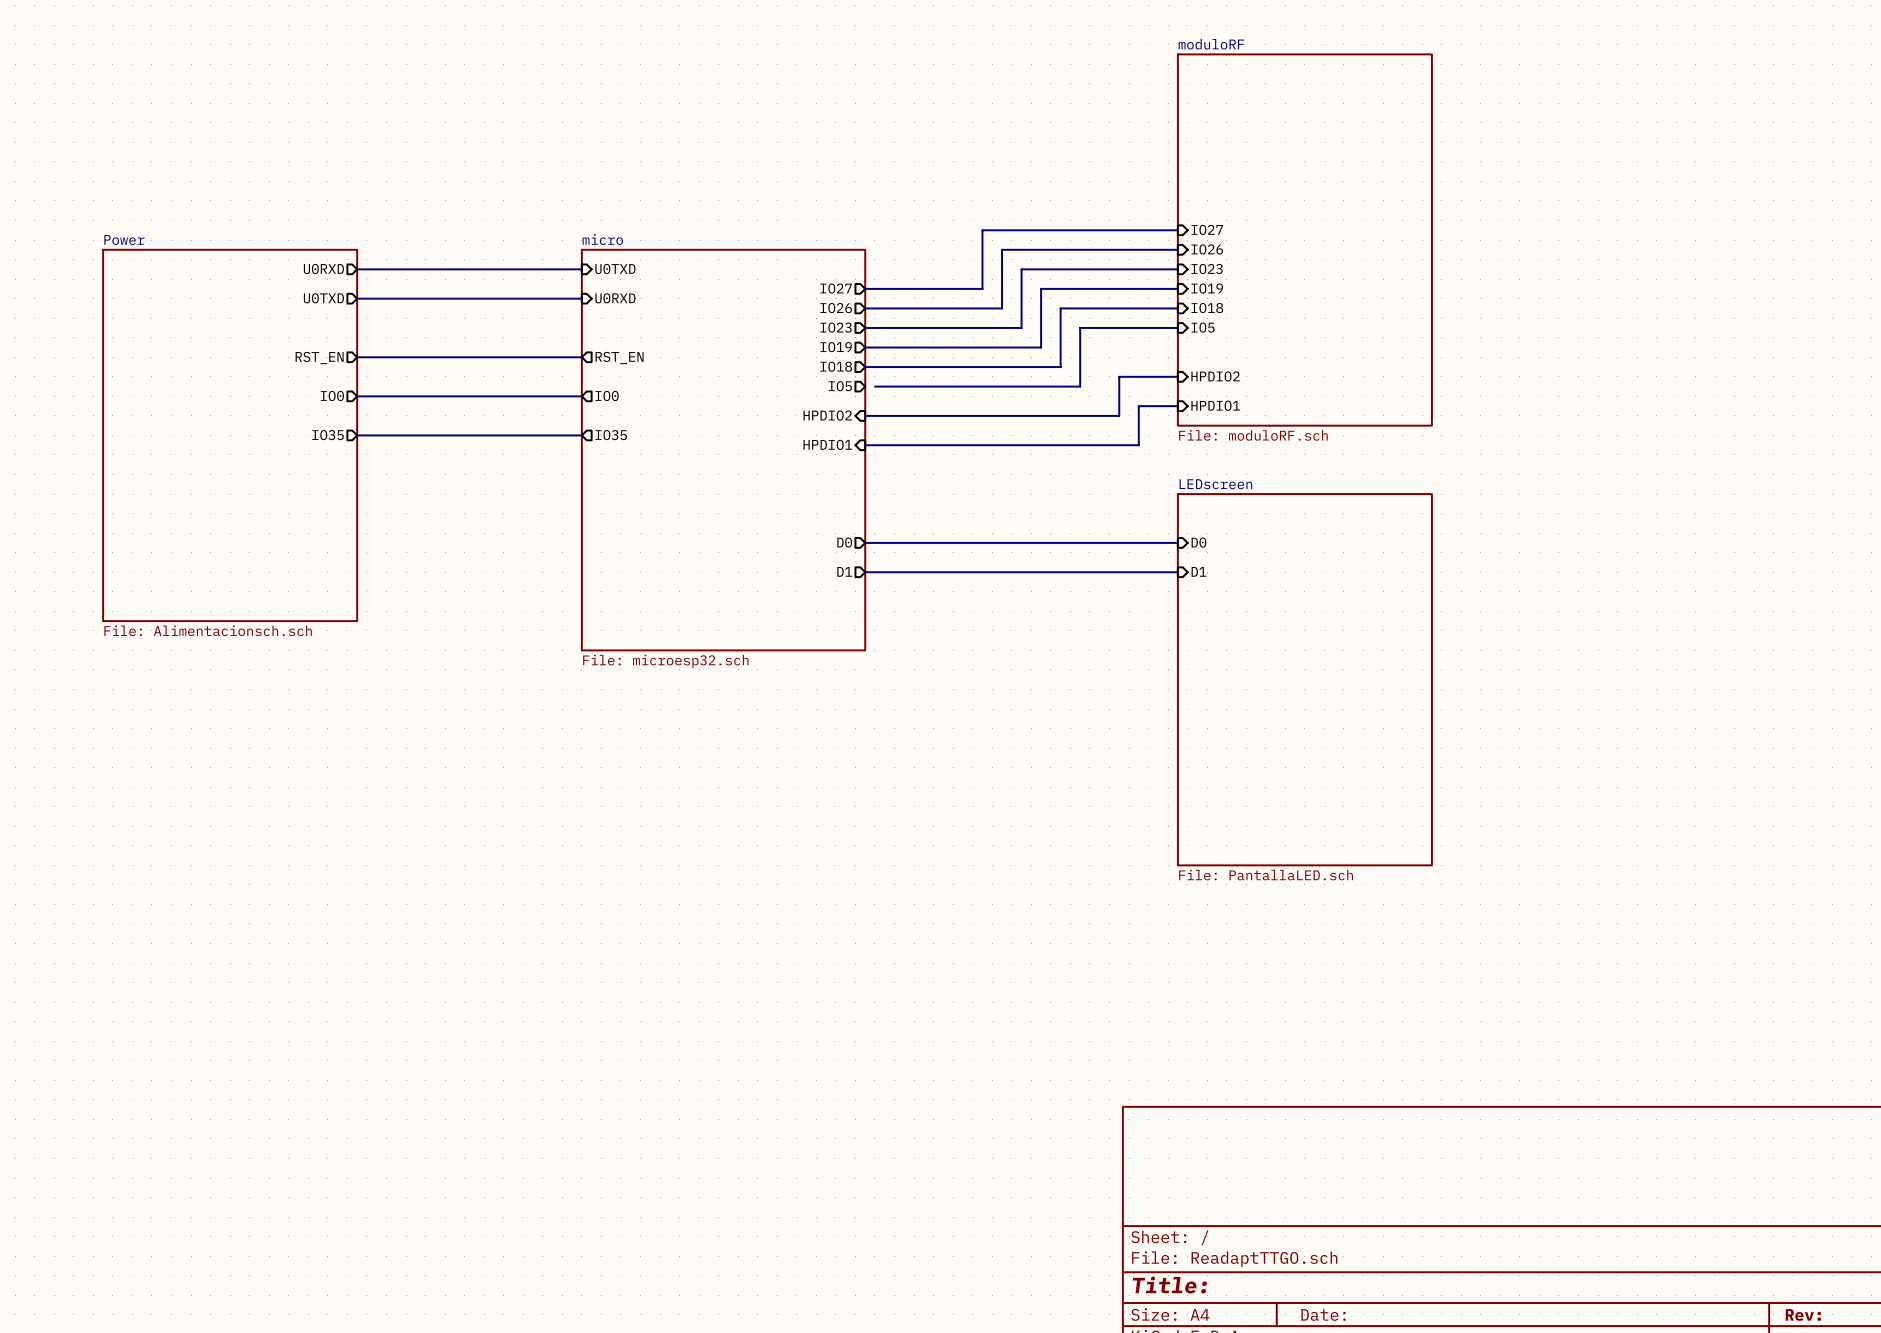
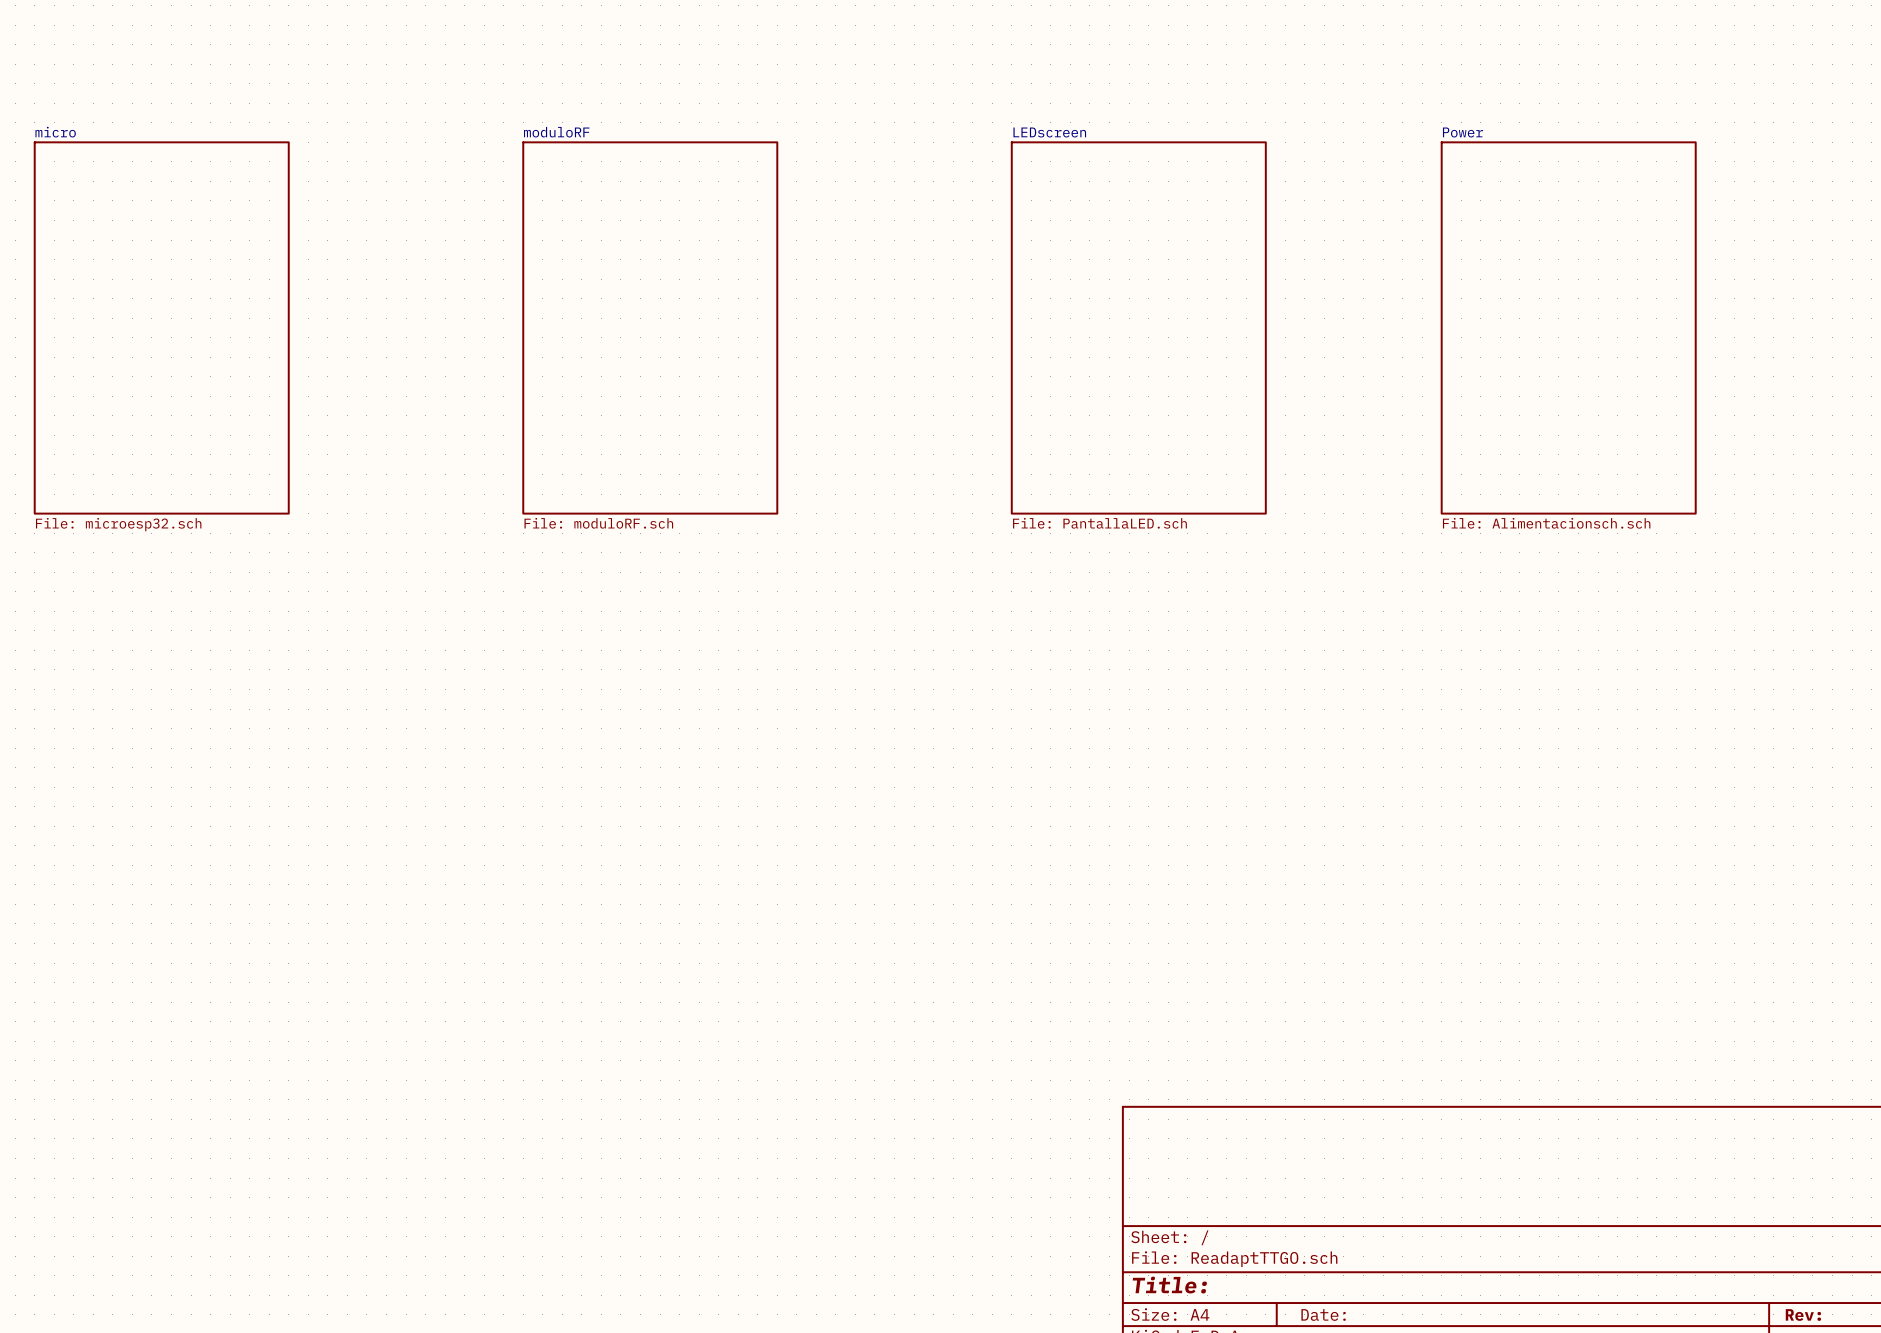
sheet pin: IO27 (1207, 229) -> none
wire: (1177, 230) (982, 230) (982, 288) (865, 288) -> none
sheet moduloRF: File: moduloRF.sch (1304, 240) -> none
wire: (1177, 249) (1002, 249) (1002, 308) (865, 308) -> none
sheet pin: IO26 (1207, 249) -> none
sheet pin: U0RXD (323, 268) -> none
sheet pin: U0TXD (615, 268) -> none
sheet pin: IO23 (1207, 268) -> none
wire: (357, 269) (581, 269) -> none
wire: (1177, 269) (1021, 269) (1021, 327) (865, 327) -> none
sheet pin: IO27 (836, 288) -> none
wire: (1177, 288) (1041, 288) (1041, 347) (865, 347) -> none
sheet pin: IO19 (1207, 288) -> none
sheet pin: U0TXD (323, 298) -> none
wire: (357, 298) (581, 298) -> none
sheet pin: U0RXD (615, 298) -> none
sheet pin: IO26 (836, 308) -> none
wire: (1177, 308) (1060, 308) (1060, 367) (865, 367) -> none
sheet pin: IO18 (1207, 308) -> none
sheet micro: none -> File: microesp32.sch (161, 327)
sheet moduloRF: none -> File: moduloRF.sch (650, 327)
sheet pin: IO23 (836, 327) -> none
sheet LEDscreen: none -> File: PantallaLED.sch (1138, 327)
wire: (1177, 327) (1080, 327) (1080, 386) (874, 386) -> none
sheet pin: IO5 (1203, 327) -> none
sheet Power: none -> File: Alimentacionsch.sch (1568, 327)
sheet pin: IO19 (836, 347) -> none
wire: (357, 357) (581, 357) -> none
sheet pin: RST_EN (319, 358) -> none
sheet pin: RST_EN (619, 358) -> none
sheet pin: IO18 (836, 366) -> none
wire: (1177, 376) (1119, 376) (1119, 415) (865, 415) -> none
sheet pin: HPDIO2 (1215, 376) -> none
sheet pin: IO5 (840, 386) -> none
sheet pin: IO0 (332, 396) -> none
wire: (357, 396) (581, 396) -> none
sheet pin: IO0 (607, 396) -> none
sheet pin: HPDIO1 (1215, 405) -> none
wire: (1177, 406) (1138, 406) (1138, 445) (865, 445) -> none
sheet pin: HPDIO2 (827, 415) -> none
sheet Power: File: Alimentacionsch.sch (230, 435) -> none
sheet pin: IO35 (328, 435) -> none
wire: (357, 435) (581, 435) -> none
sheet pin: IO35 (611, 435) -> none
sheet pin: HPDIO1 (827, 444) -> none
sheet micro: File: microesp32.sch (723, 450) -> none
sheet pin: D0 (844, 542) -> none
wire: (865, 542) (1177, 542) -> none
sheet pin: D0 (1198, 542) -> none
sheet pin: D1 (844, 571) -> none
sheet pin: D1 (1199, 571) -> none
wire: (865, 572) (1177, 572) -> none
sheet LEDscreen: File: PantallaLED.sch (1304, 679) -> none

